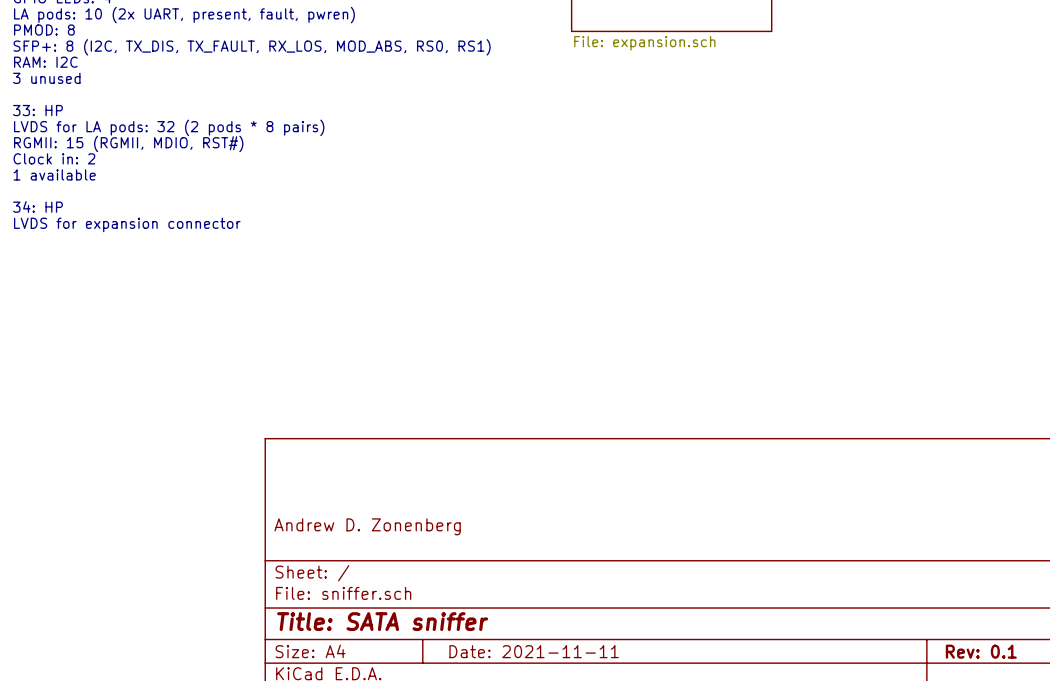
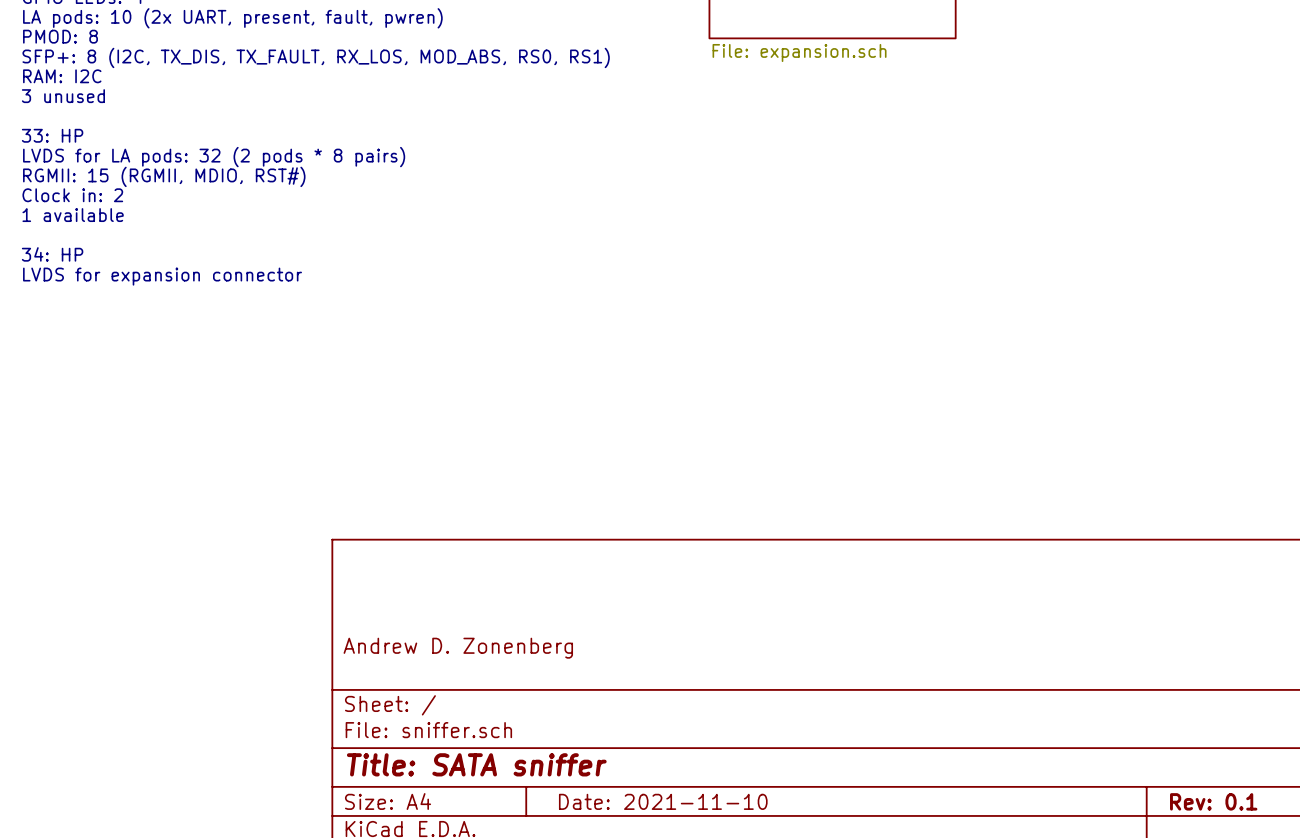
title block: Date: 2021-11-11 (534, 651) -> Date: 2021-11-10 (663, 801)

